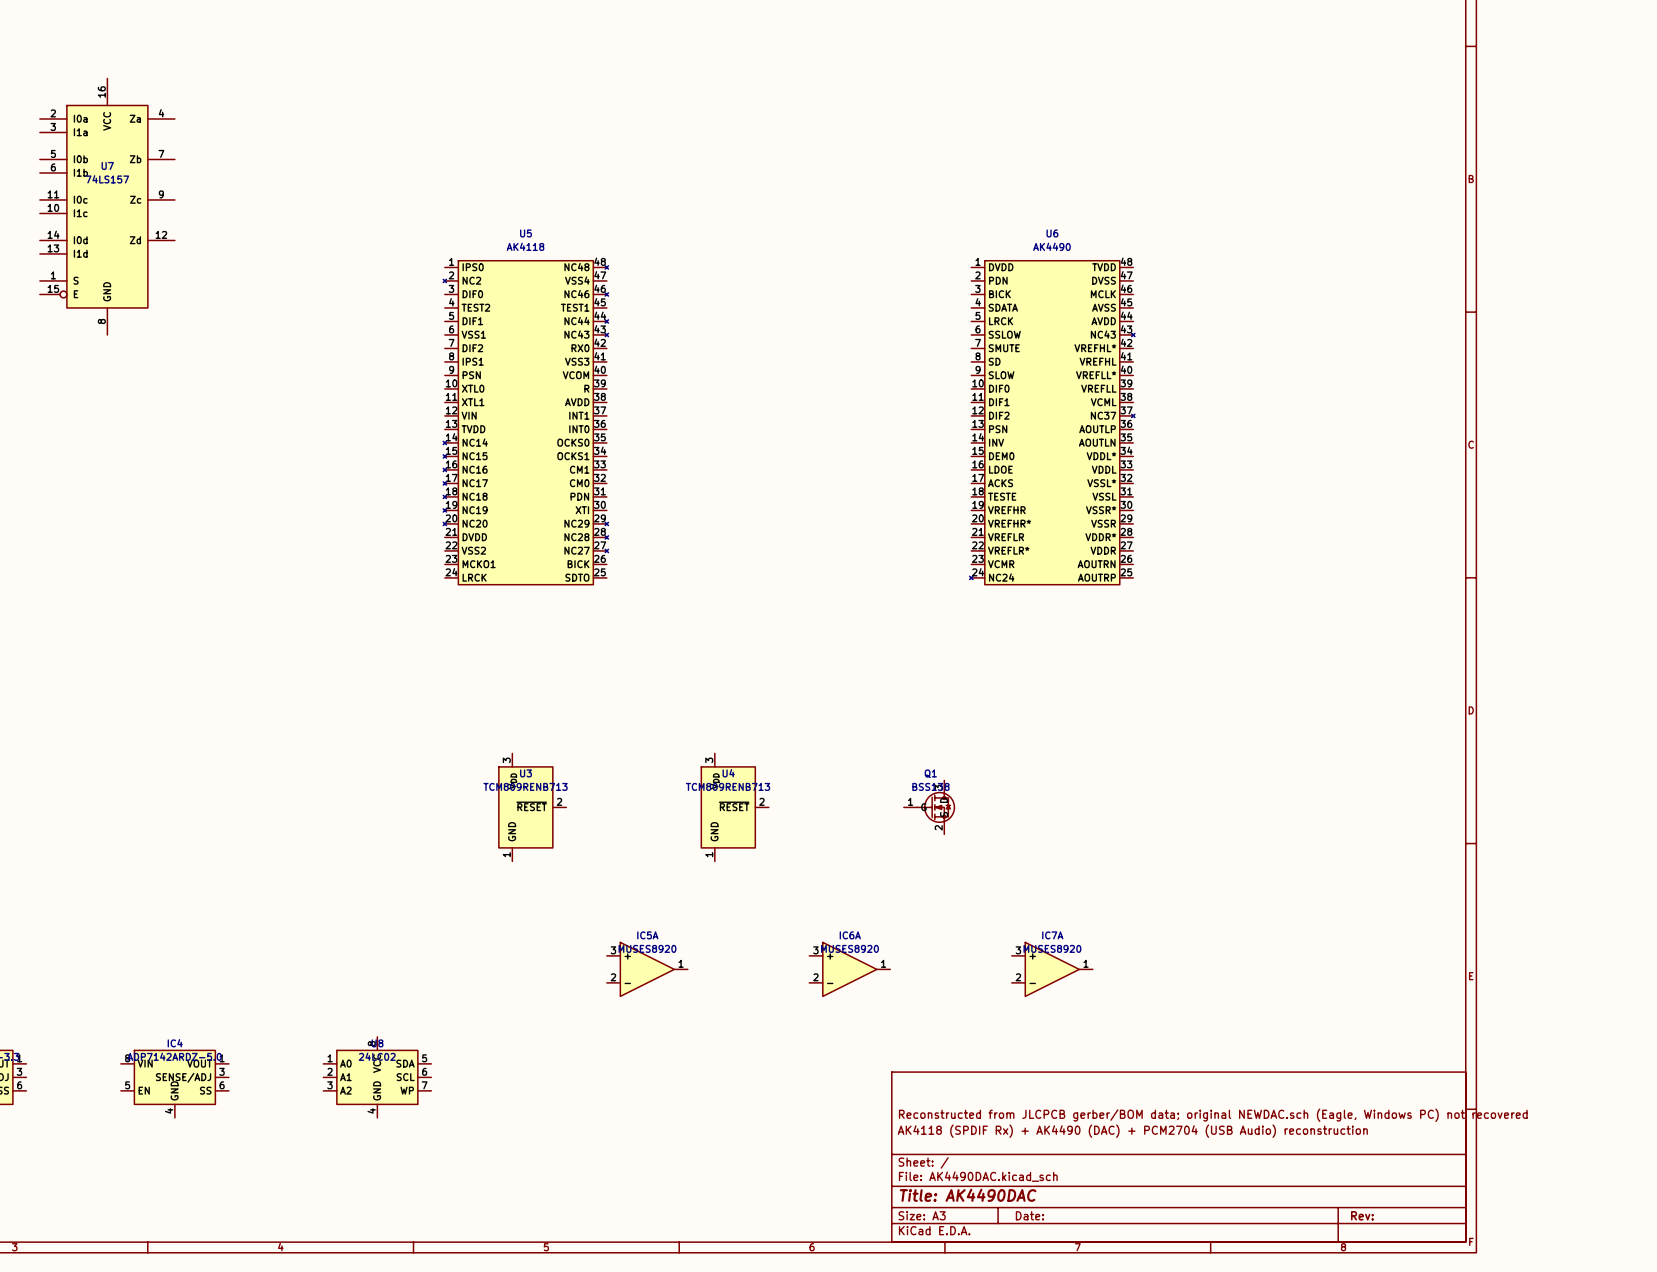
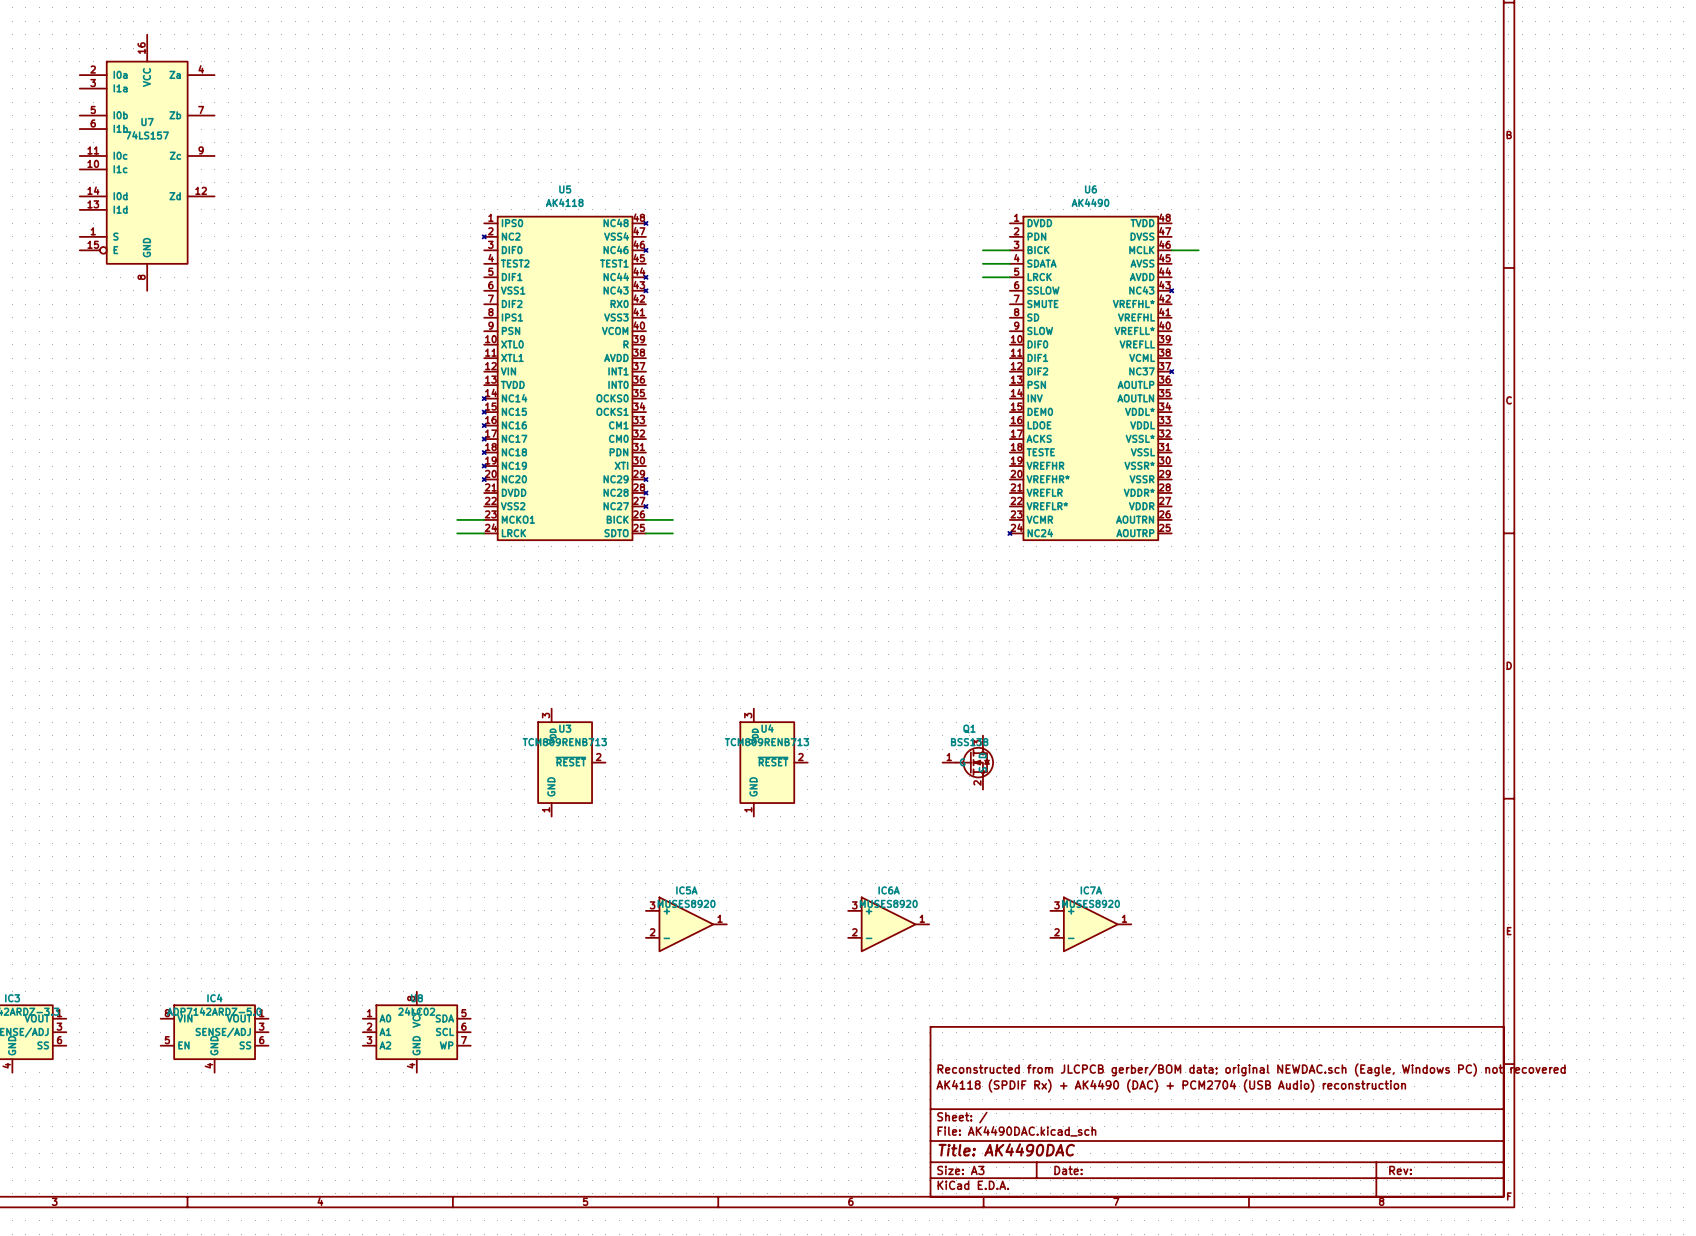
wire: none -> (982, 250) (1009, 250)
wire: none -> (1171, 250) (1198, 250)
wire: none -> (982, 263) (1009, 263)
wire: none -> (982, 277) (1009, 277)
wire: none -> (457, 519) (484, 519)
wire: none -> (645, 519) (672, 519)
wire: none -> (457, 533) (484, 533)
wire: none -> (645, 533) (672, 533)

